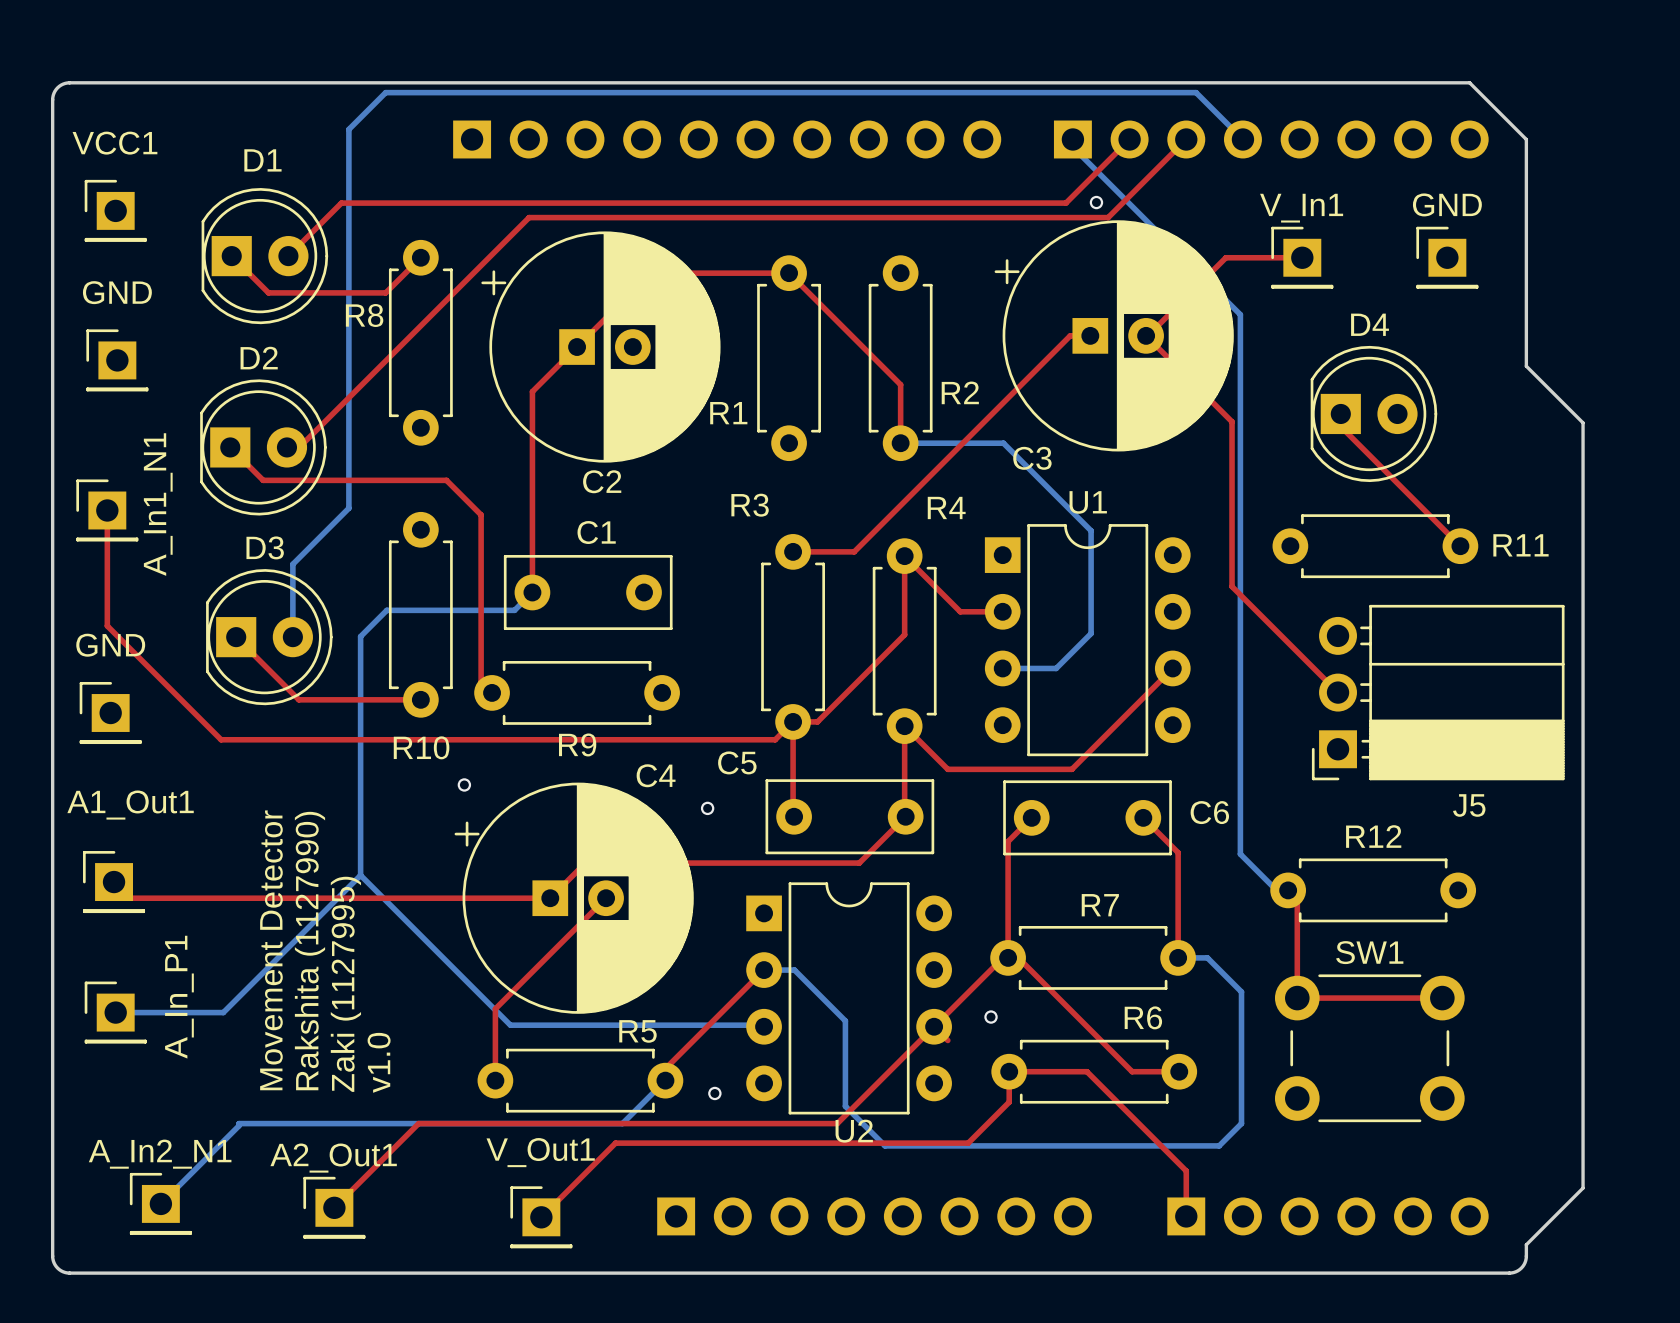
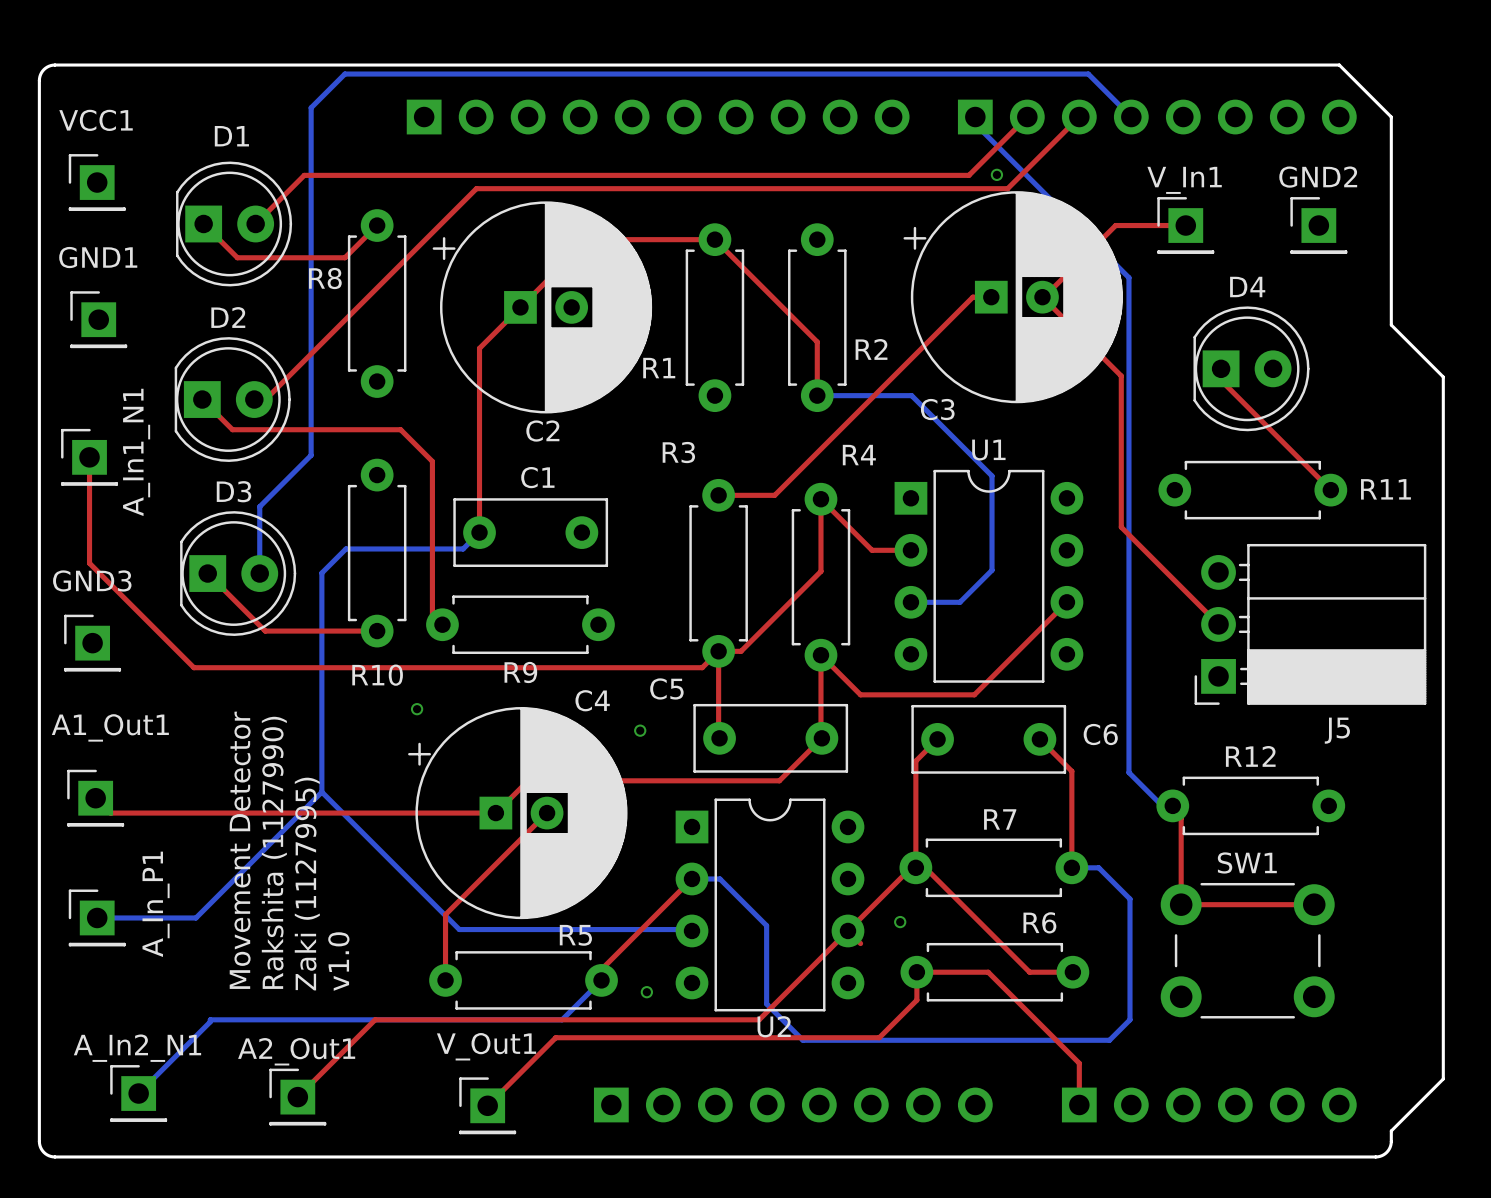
GND name: GND (1447, 204) -> GND2 (1318, 177)
GND name: GND (117, 292) -> GND1 (98, 257)
GND name: GND (110, 645) -> GND3 (92, 580)

